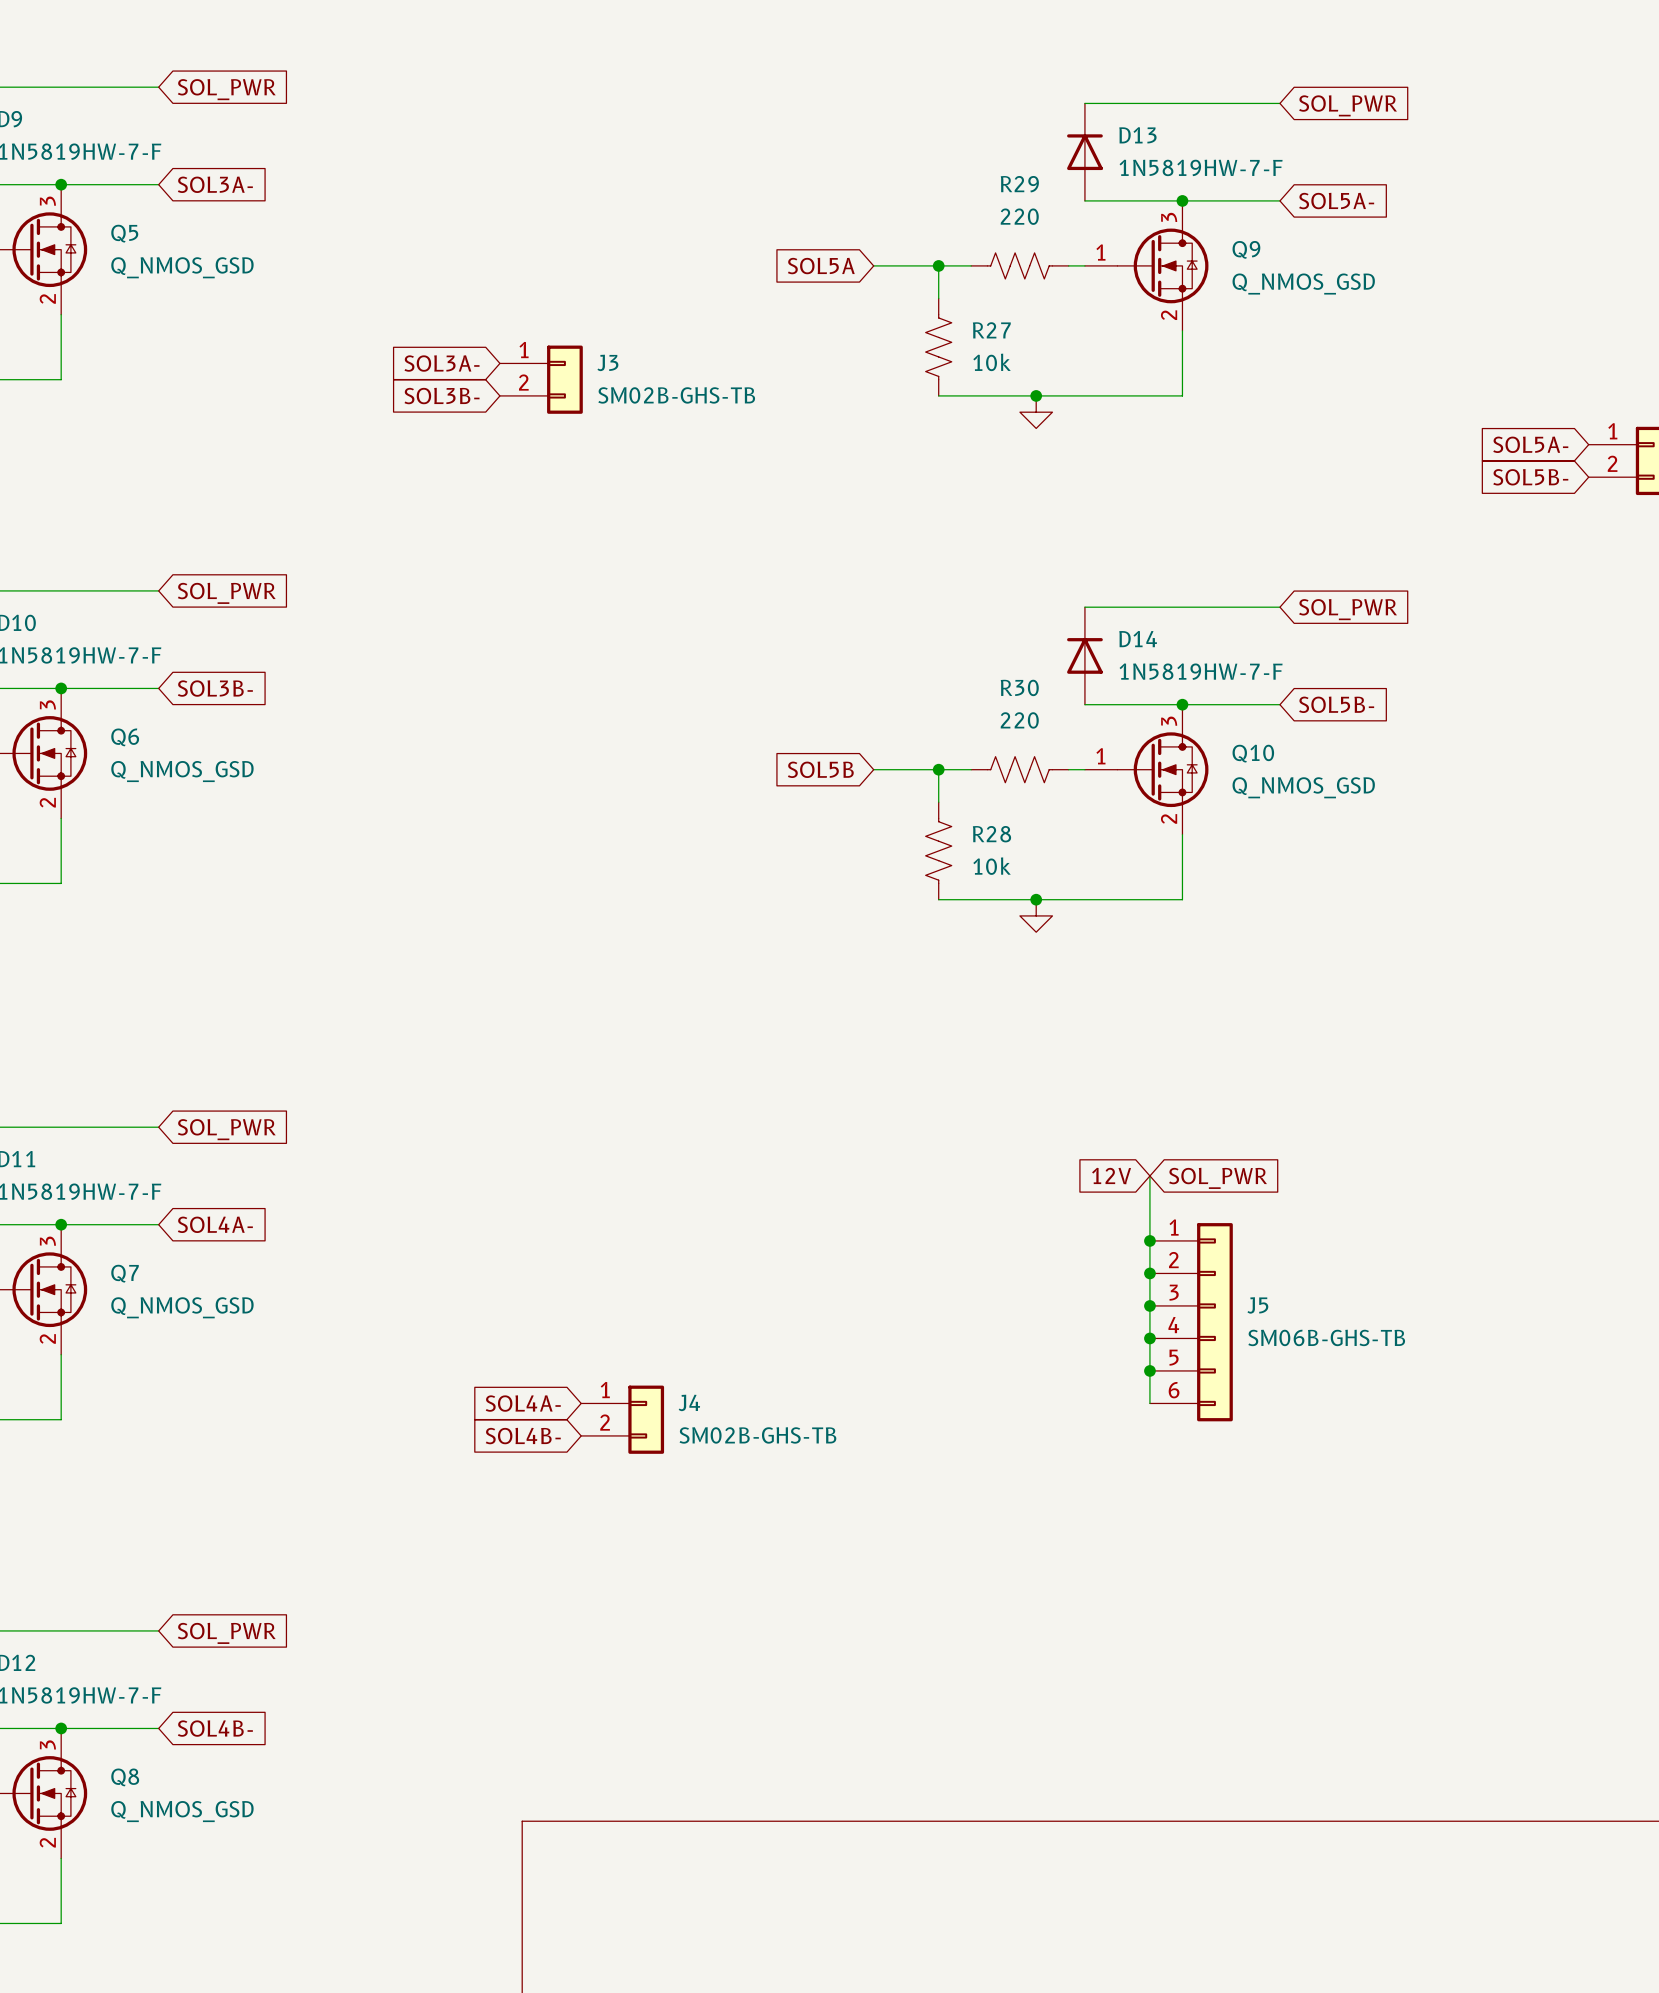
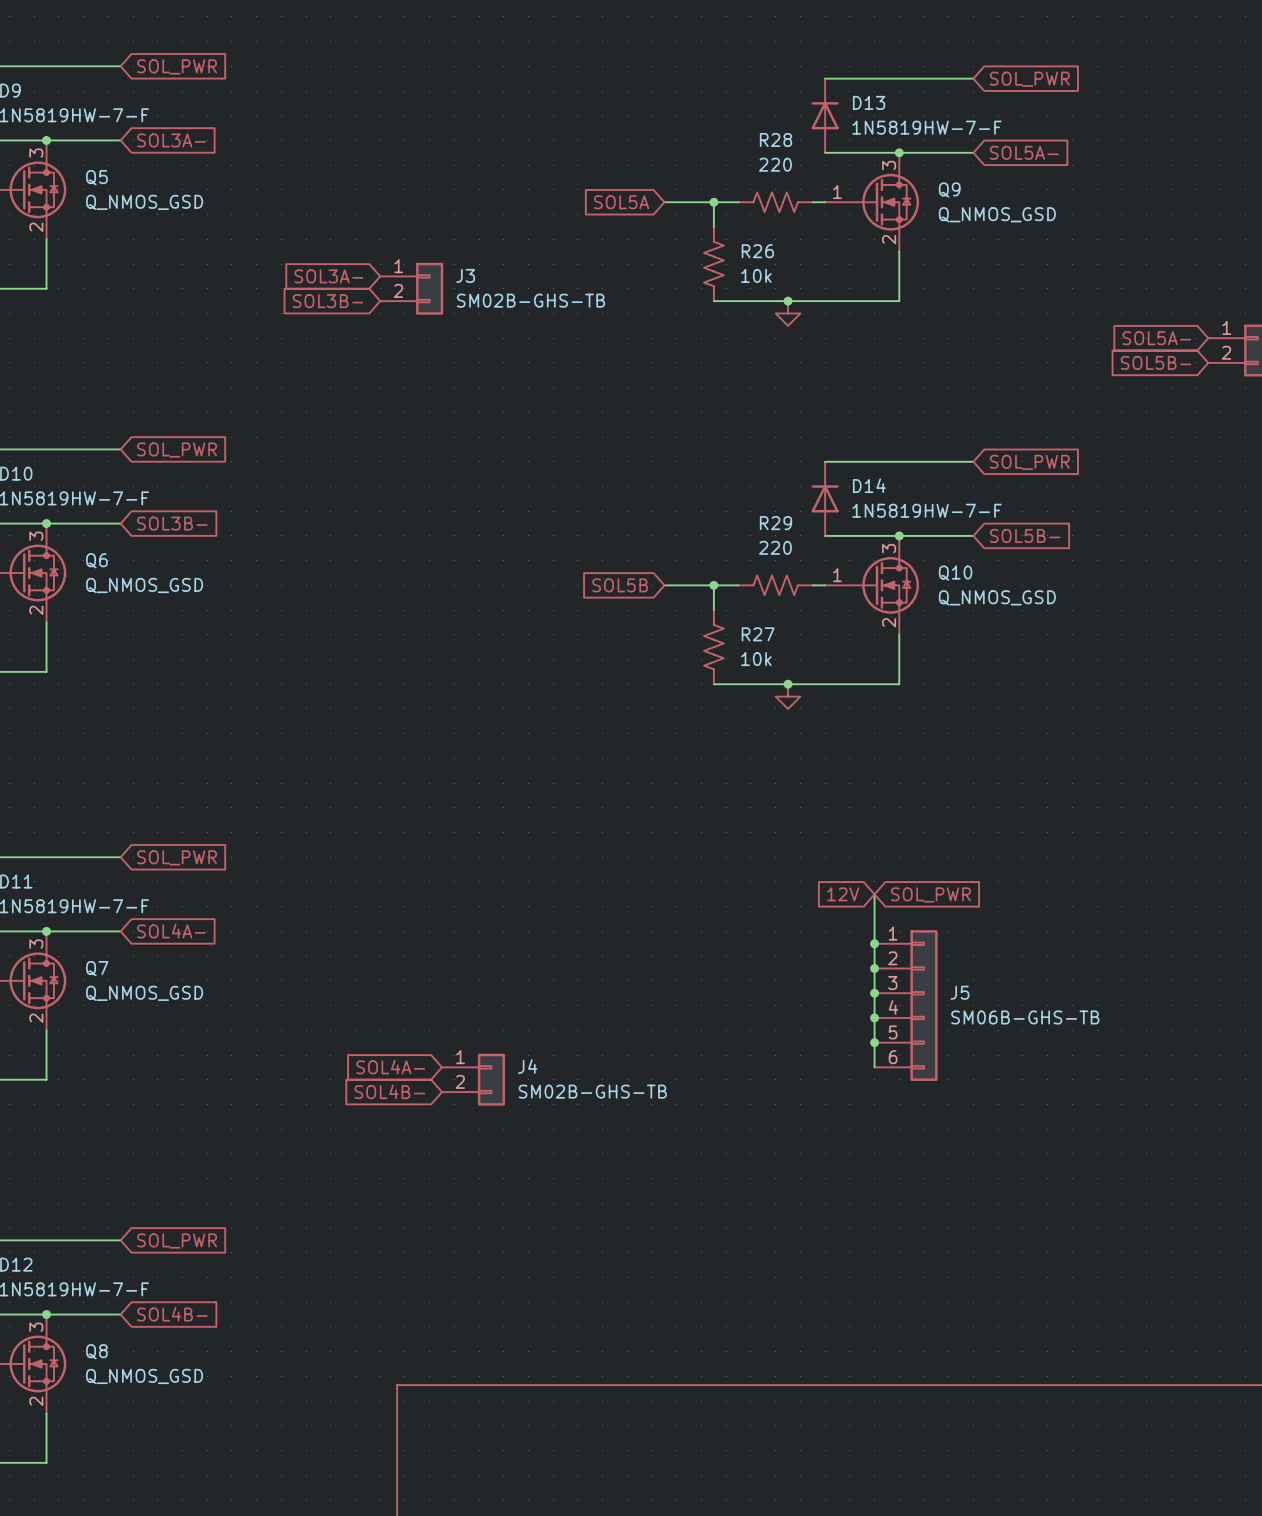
R29 name: R29 (1019, 184) -> R28 (775, 139)
R27 name: R27 (991, 330) -> R26 (757, 251)
R30 name: R30 (1019, 687) -> R29 (775, 523)
R28 name: R28 (991, 834) -> R27 (758, 634)

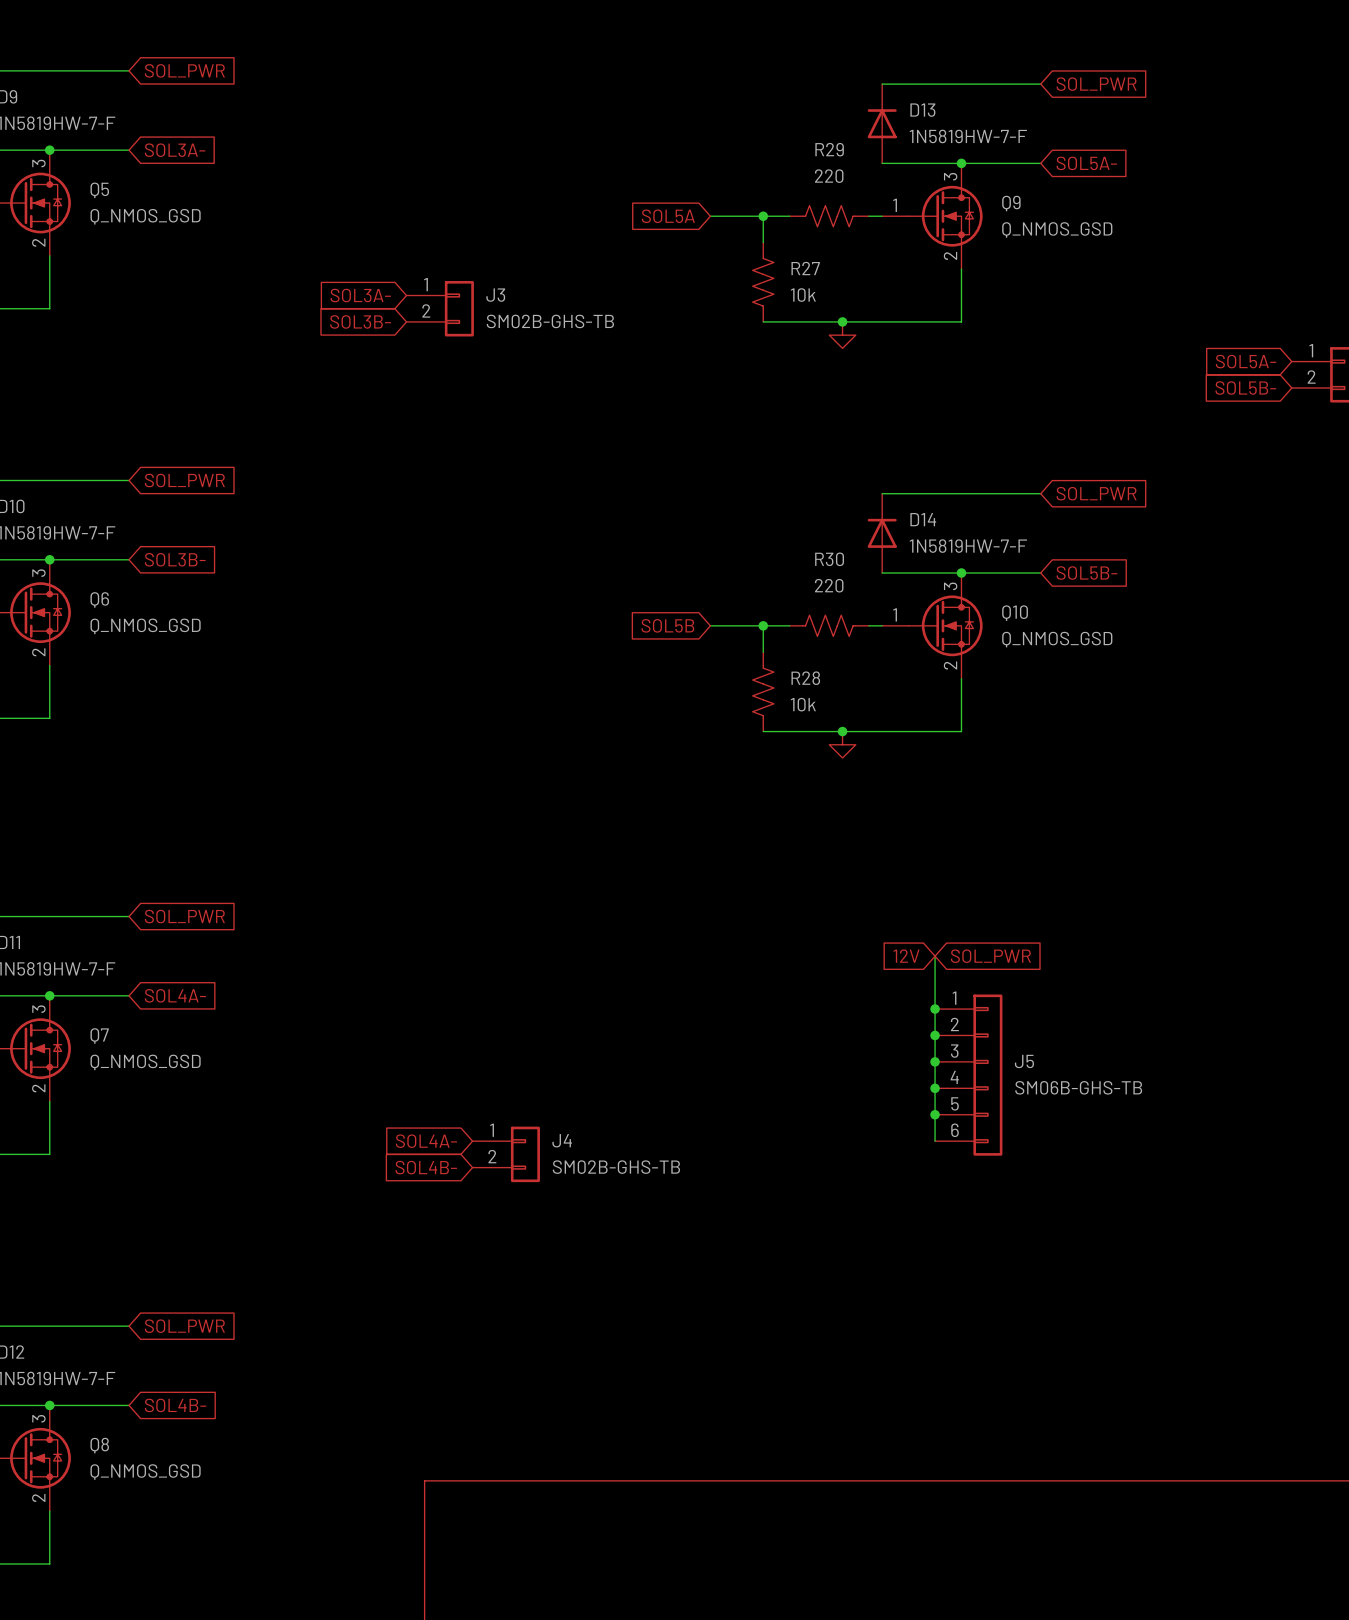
R28 name: R28 (775, 139) -> R29 (829, 149)
R26 name: R26 (757, 251) -> R27 (805, 268)
R29 name: R29 (775, 523) -> R30 (829, 559)
R27 name: R27 (758, 634) -> R28 (805, 678)

